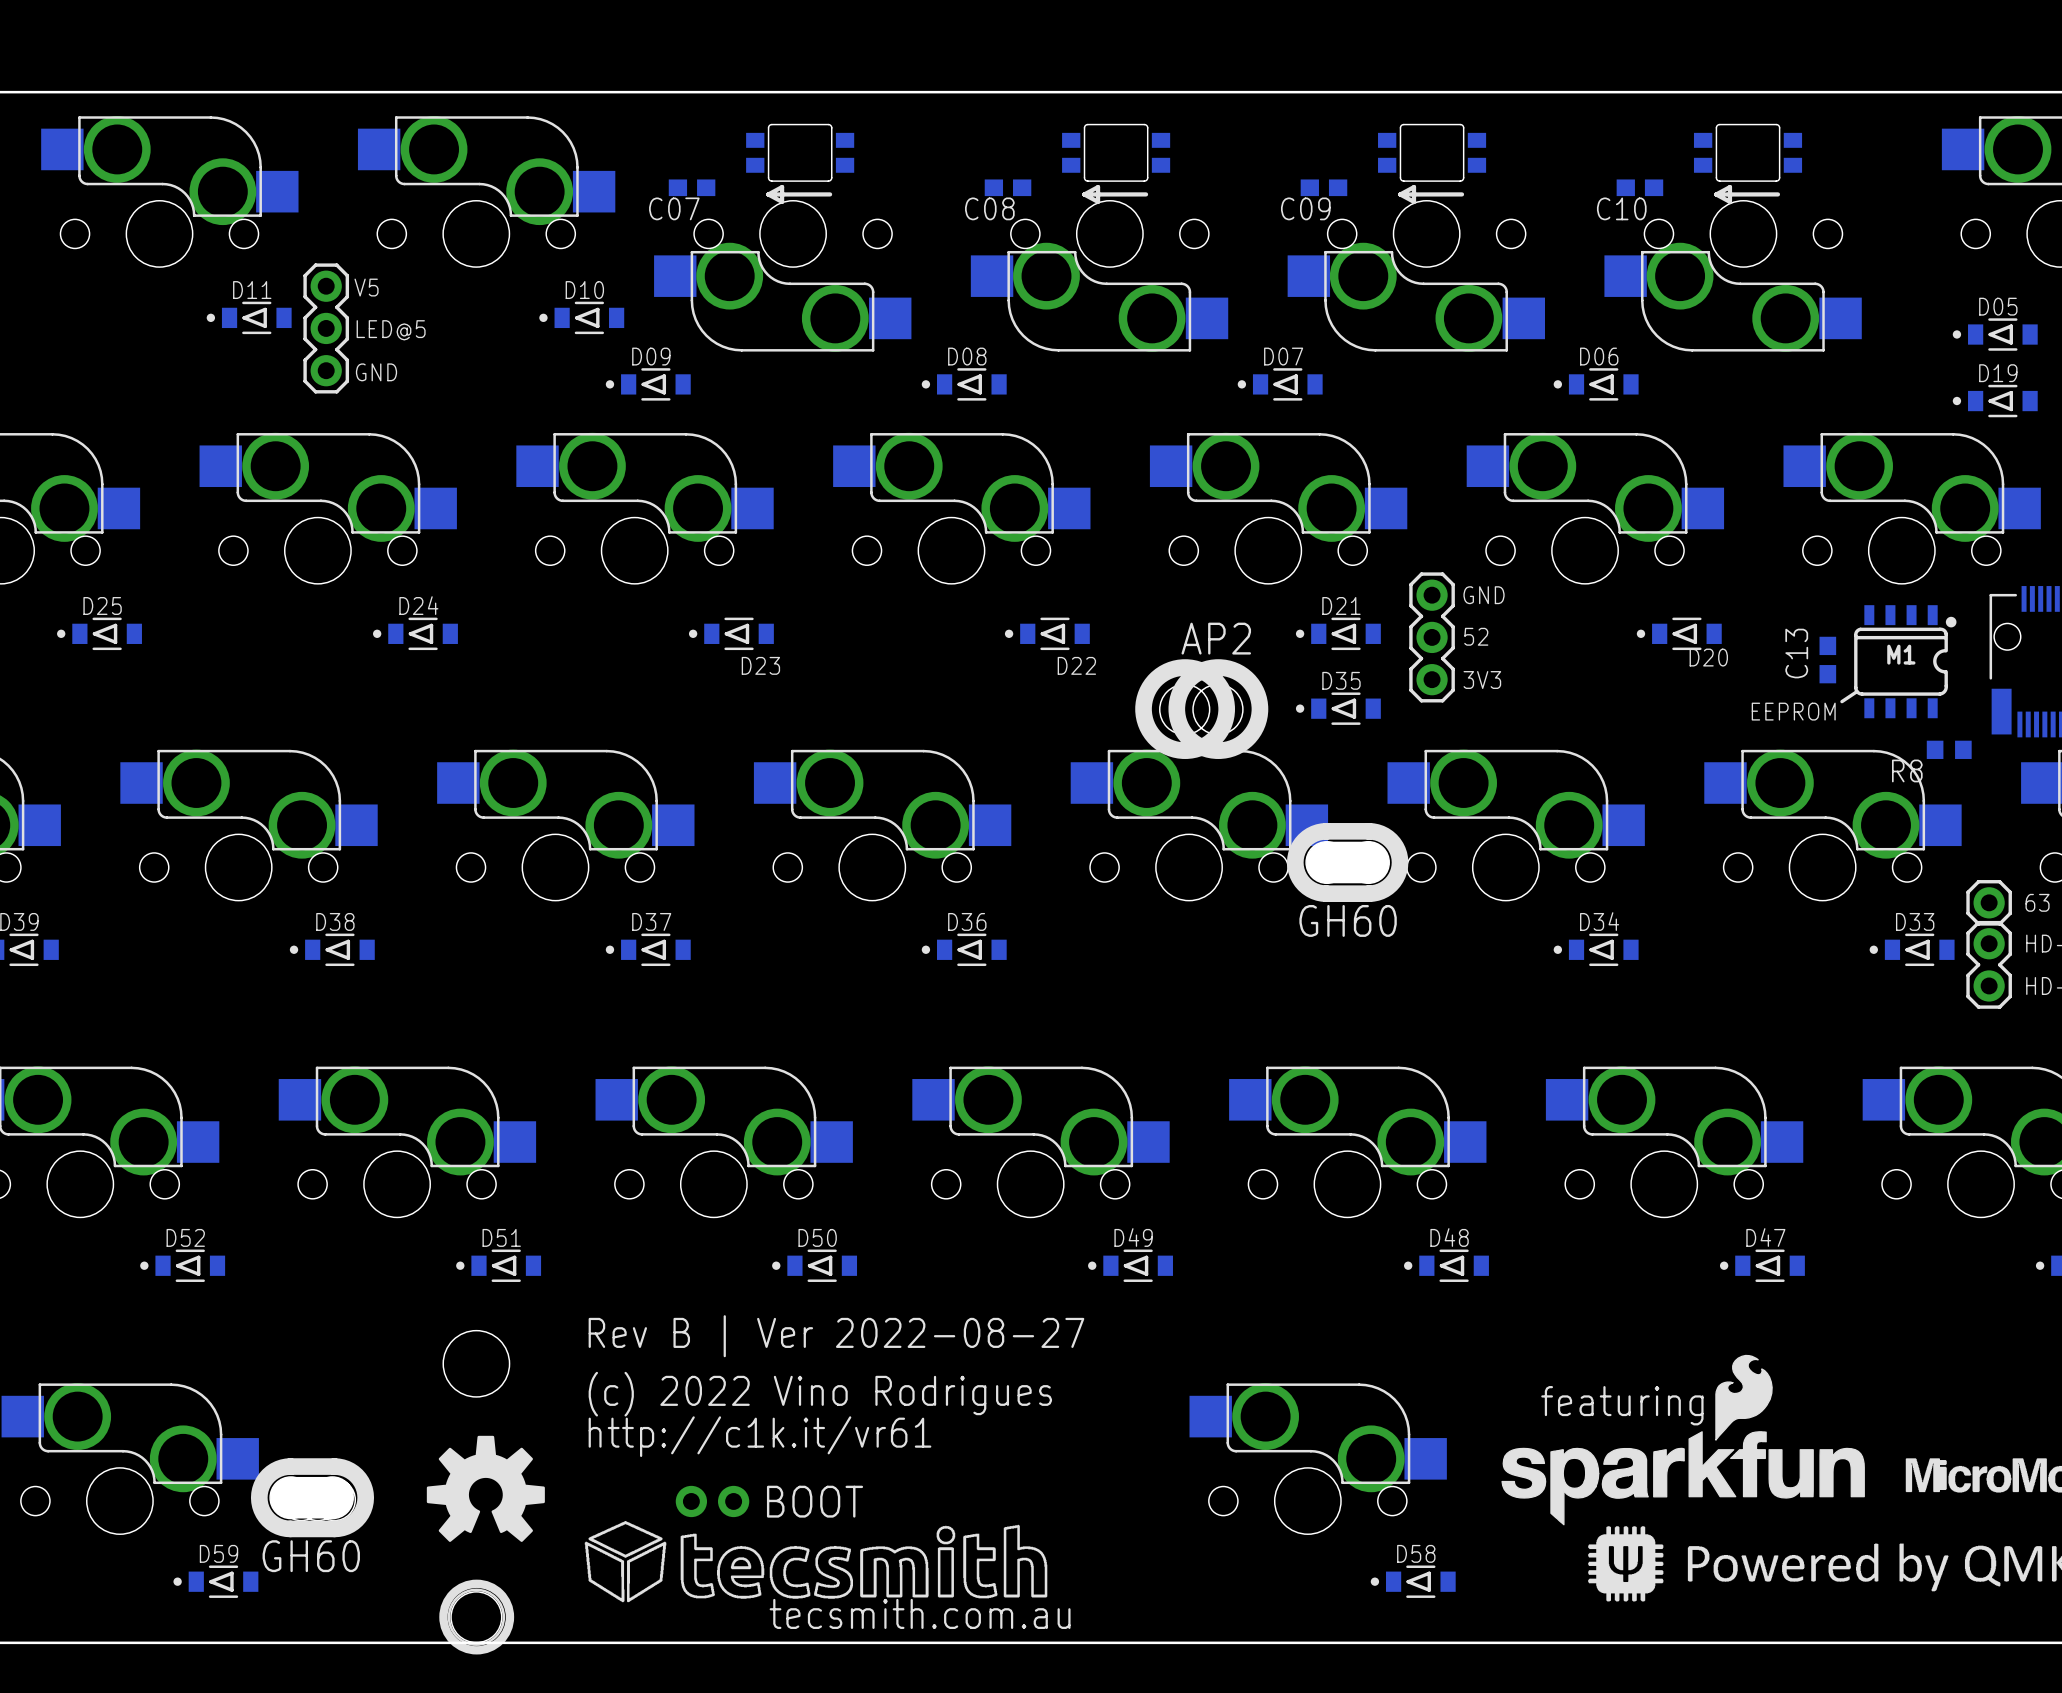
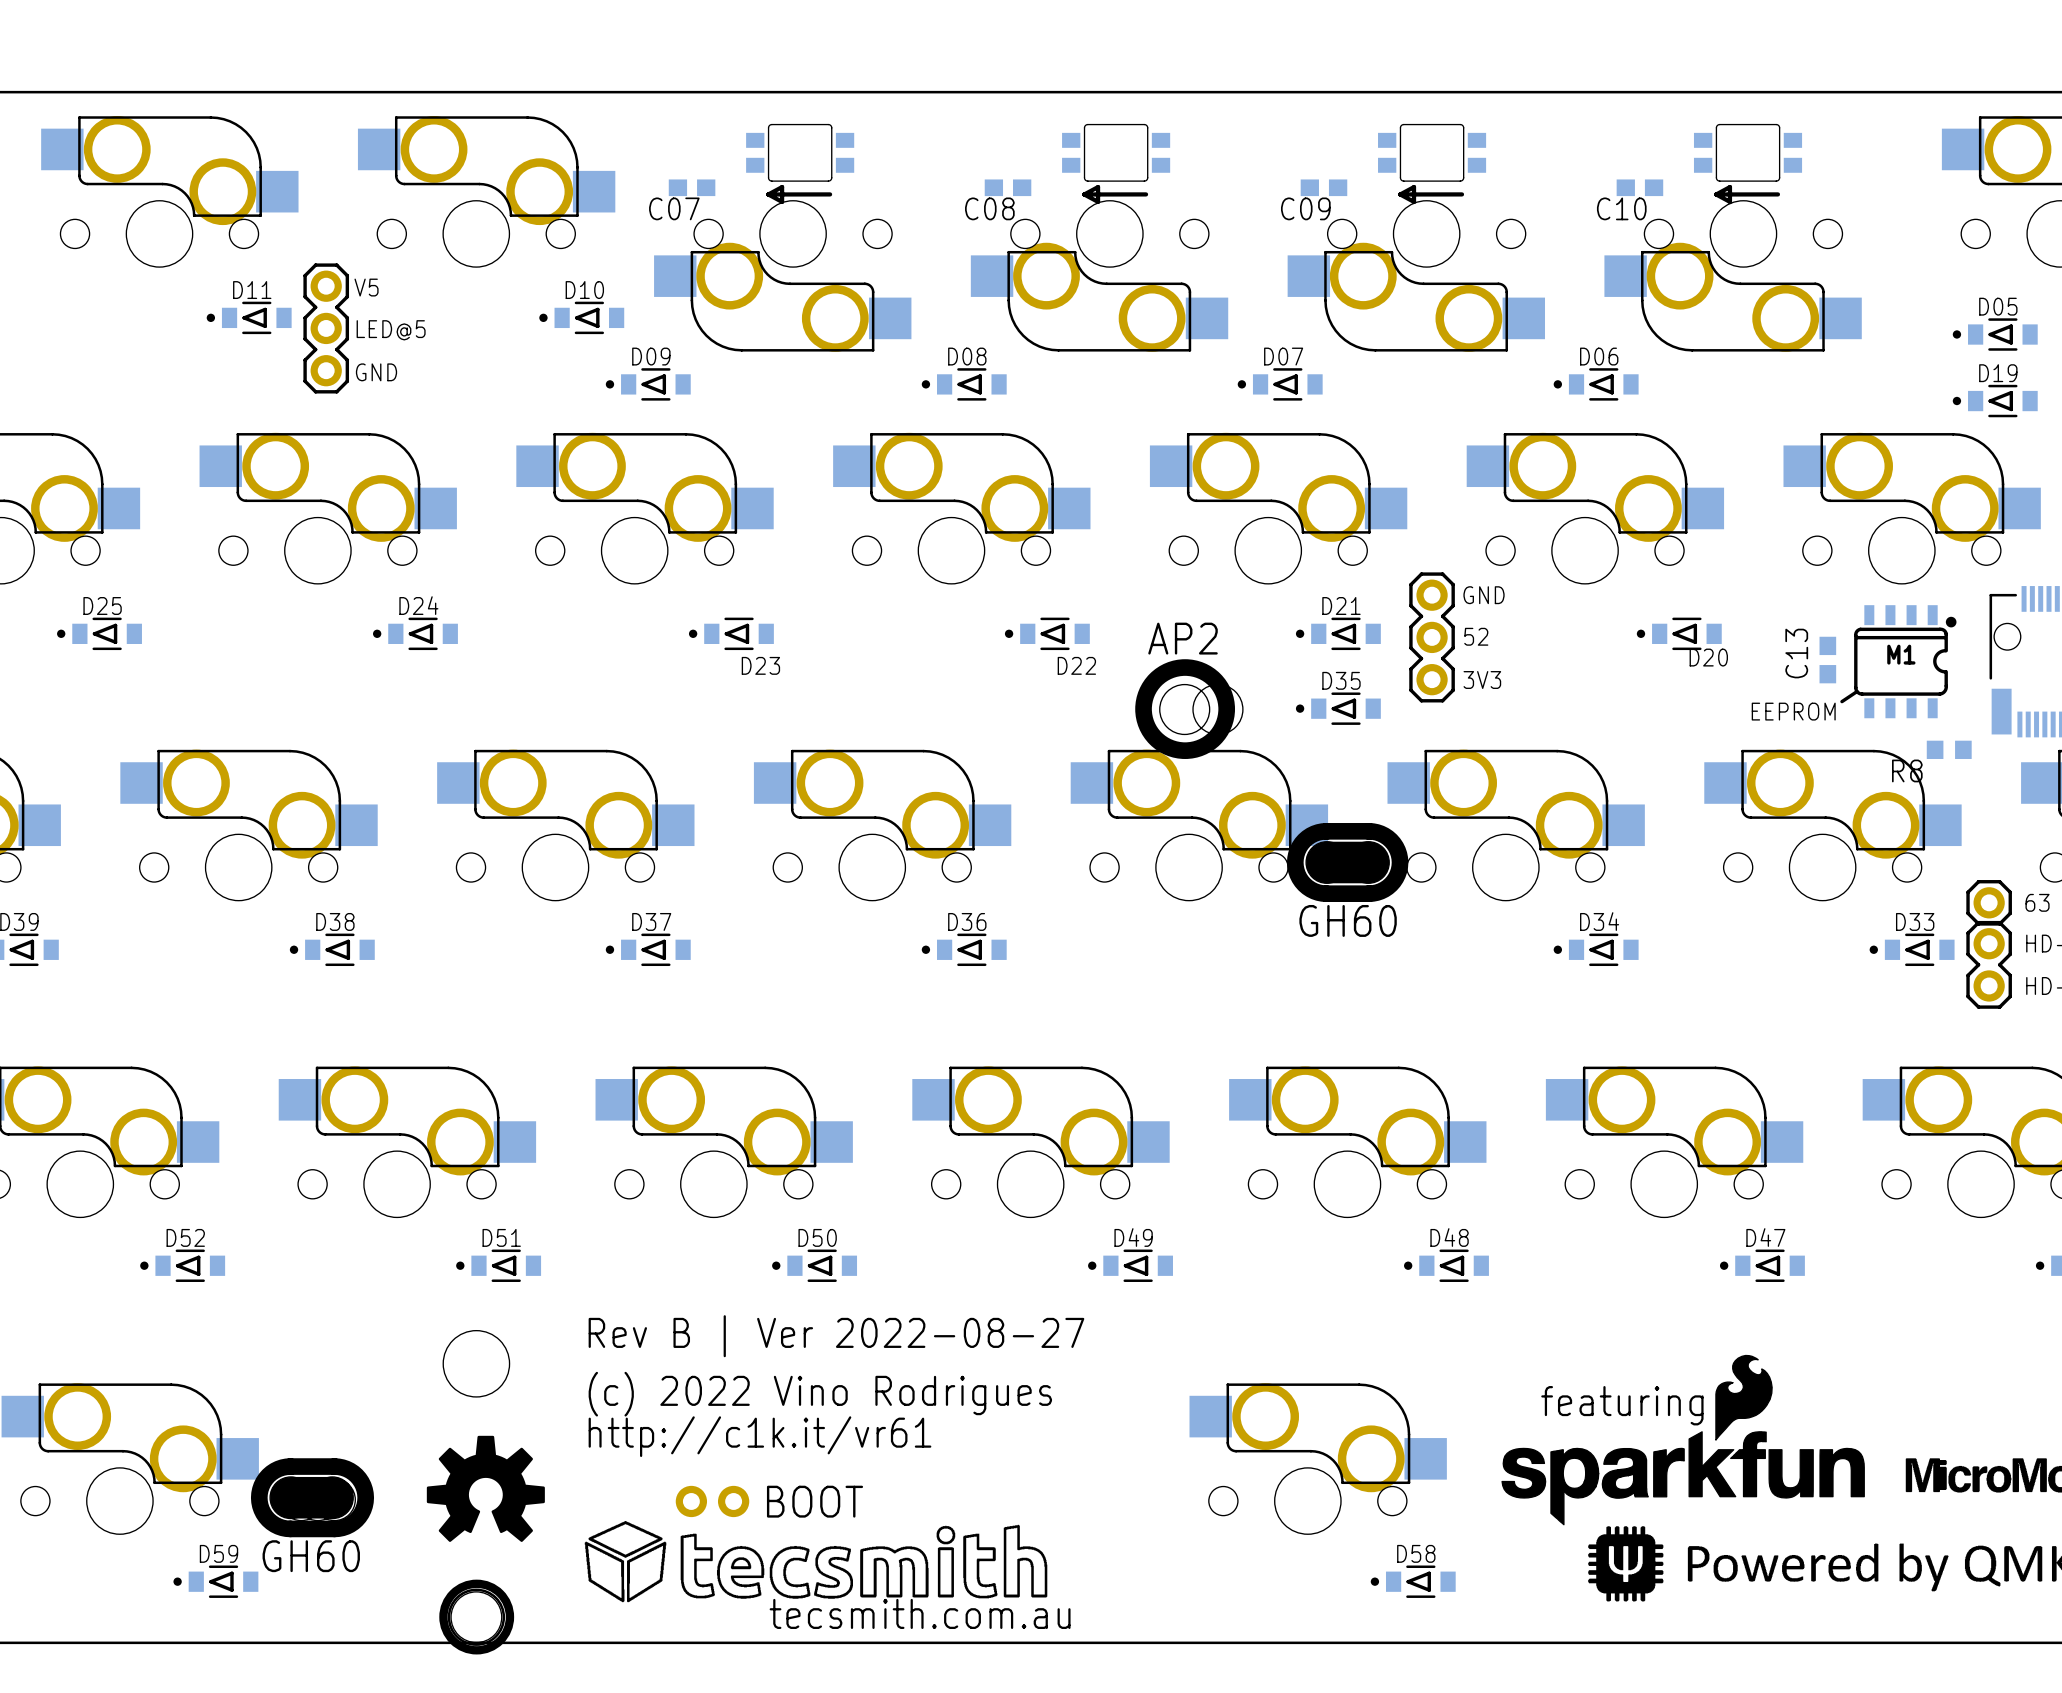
text position: AP2 (1216, 638) -> AP2 (1183, 638)
drawing: [1168, 659, 1269, 759] -> none

